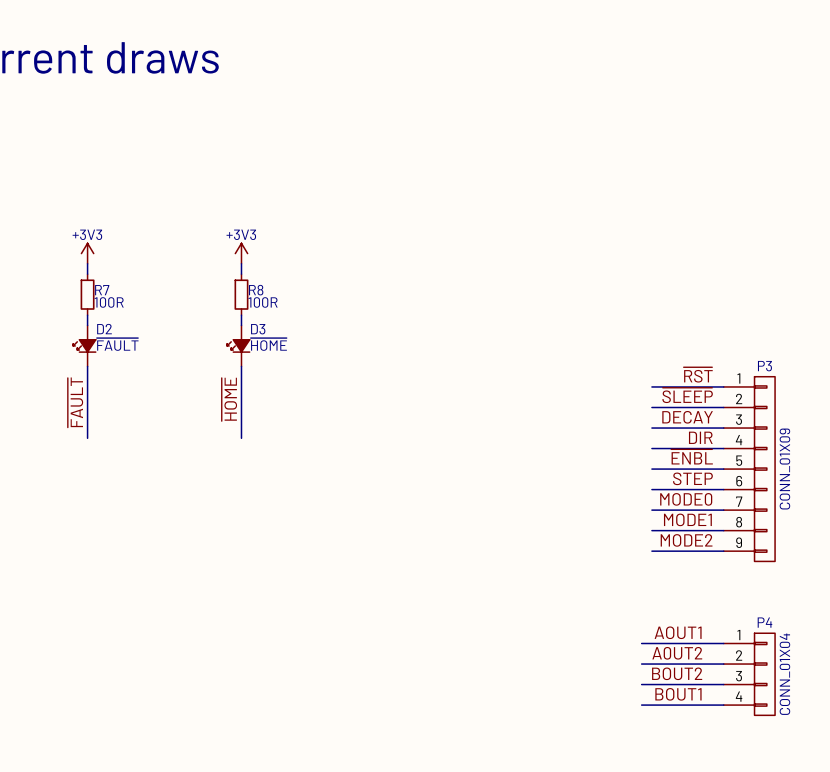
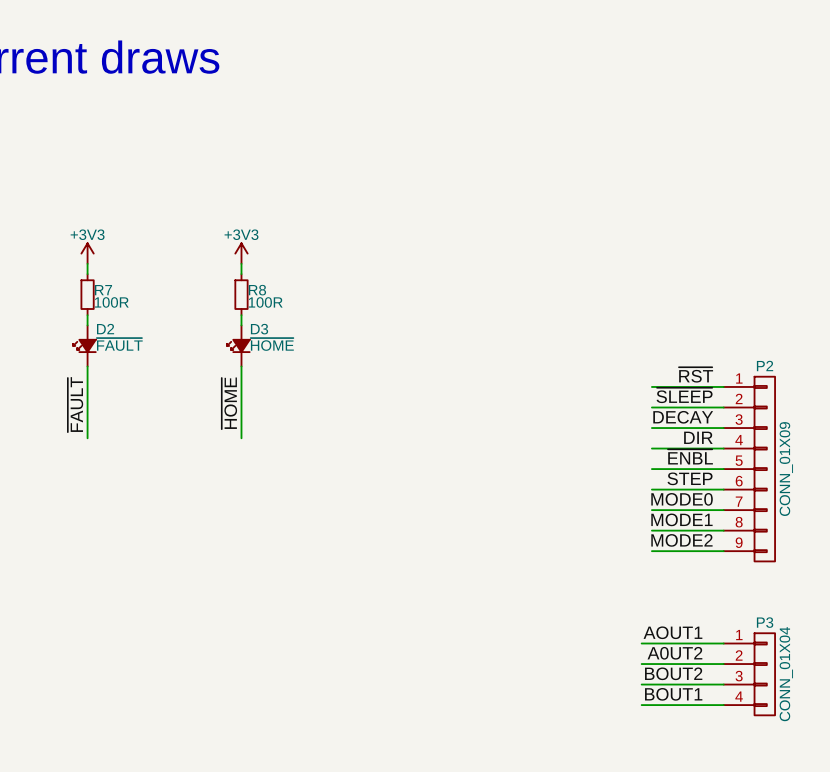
P3 name: P3 (764, 366) -> P2 (765, 366)
P4 name: P4 (764, 622) -> P3 (765, 622)

